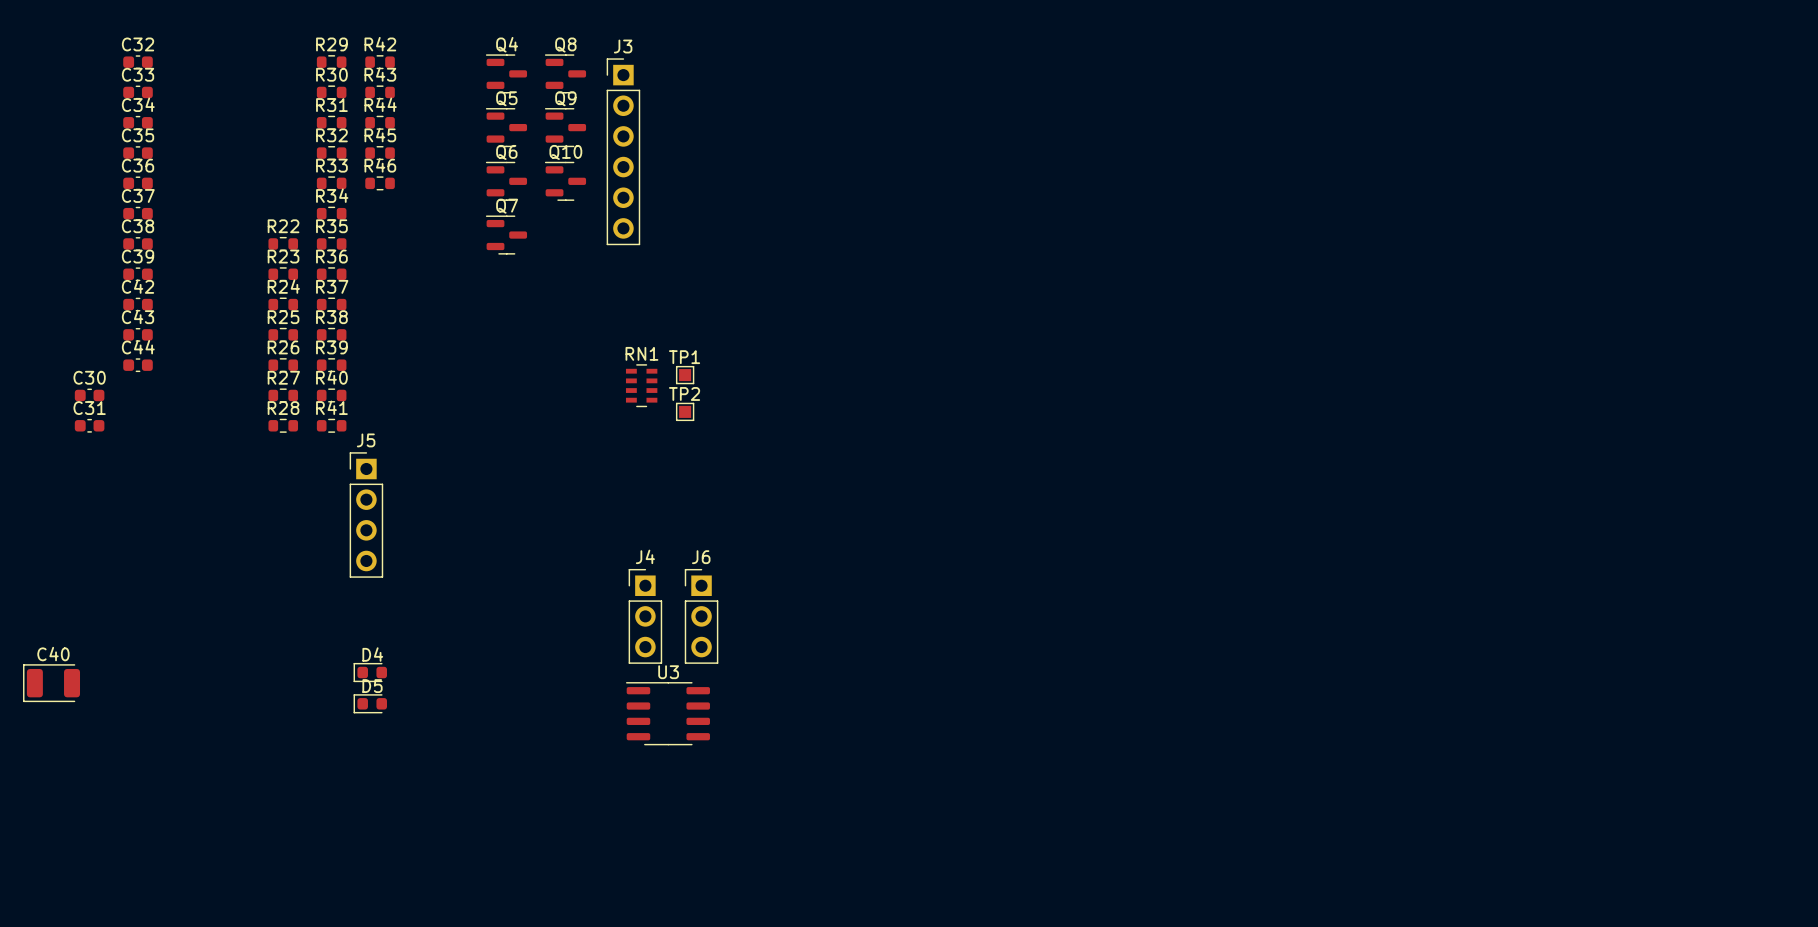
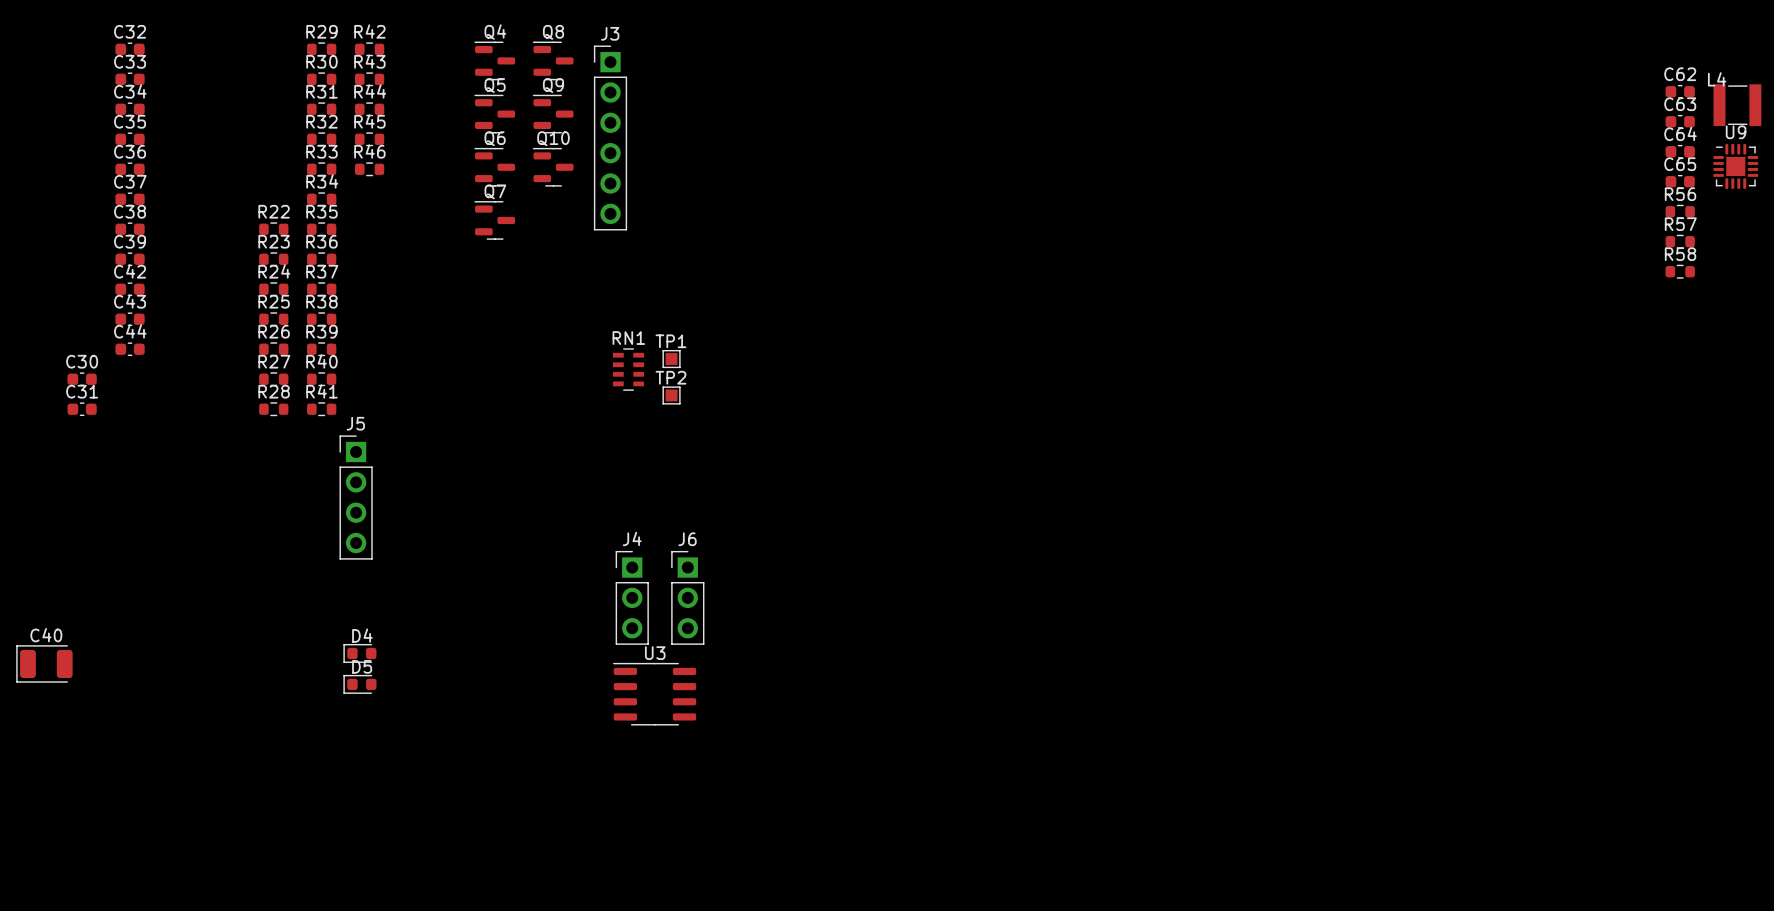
C62: none -> (1680, 91)
L4: none -> (1737, 105)
C63: none -> (1680, 121)
C64: none -> (1680, 151)
U9: none -> (1735, 166)
C65: none -> (1680, 181)
R56: none -> (1680, 211)
R57: none -> (1680, 241)
R58: none -> (1680, 271)

